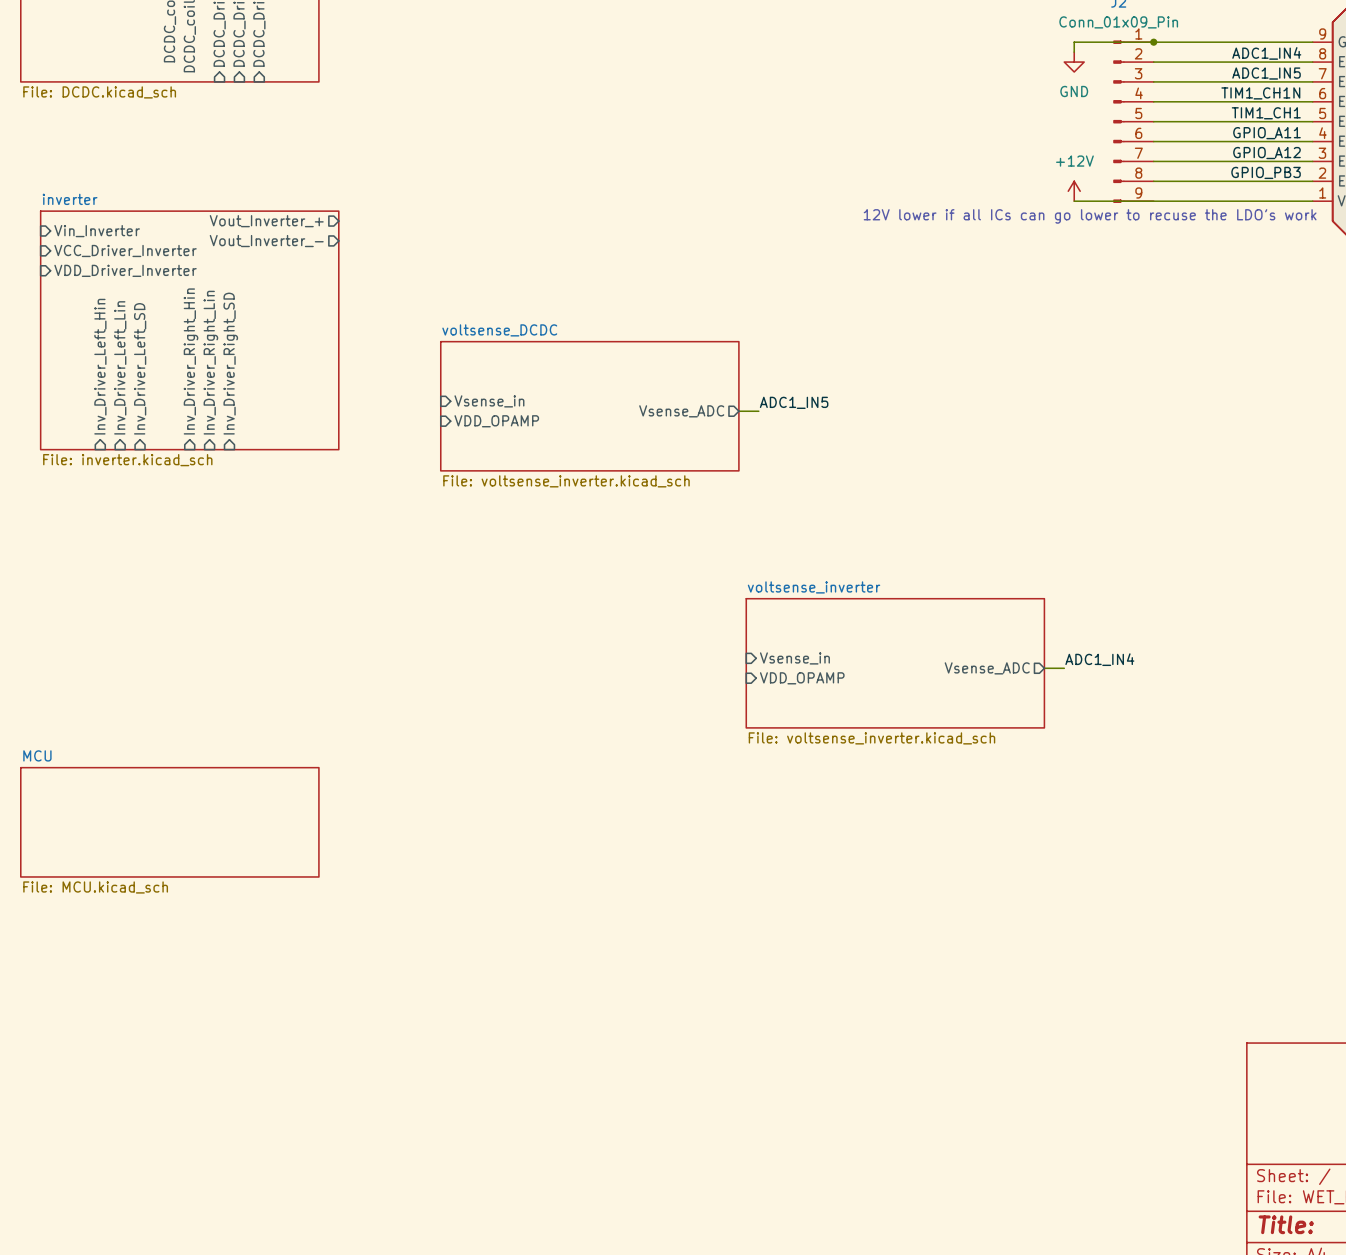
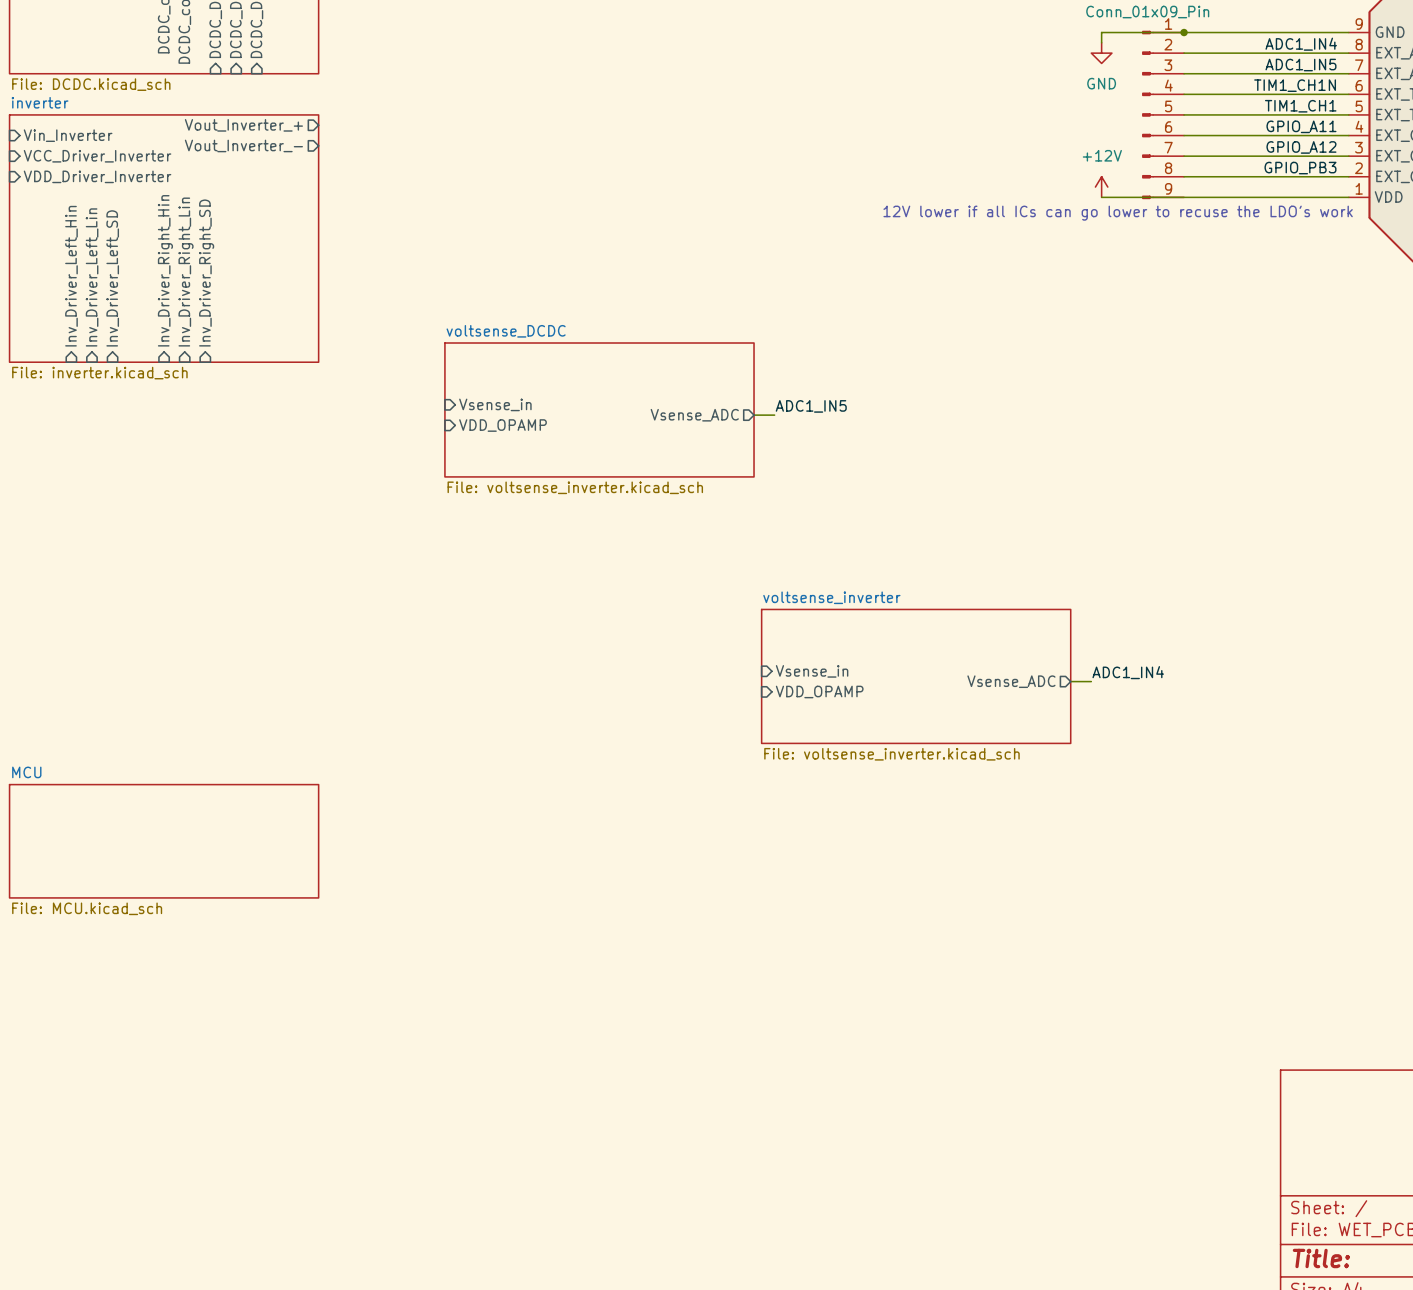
sheet pin position: Vout_Inverter_+ (266, 221) -> Vout_Inverter_+ (243, 125)
sheet pin position: Vin_Inverter (97, 231) -> Vin_Inverter (68, 135)
sheet pin position: Vout_Inverter_- (266, 241) -> Vout_Inverter_- (243, 145)
sheet pin position: VCC_Driver_Inverter (125, 250) -> VCC_Driver_Inverter (97, 156)
sheet pin position: VDD_Driver_Inverter (125, 270) -> VDD_Driver_Inverter (97, 176)
sheet inverter position: (189, 330) -> (164, 238)
sheet pin position: Inv_Driver_Right_Hin (191, 361) -> Inv_Driver_Right_Hin (165, 270)
sheet pin position: Inv_Driver_Right_Lin (210, 362) -> Inv_Driver_Right_Lin (186, 272)
sheet pin position: Inv_Driver_Right_SD (230, 363) -> Inv_Driver_Right_SD (206, 273)
sheet pin position: Inv_Driver_Left_Hin (100, 366) -> Inv_Driver_Left_Hin (71, 276)
sheet pin position: Inv_Driver_Left_Lin (120, 367) -> Inv_Driver_Left_Lin (92, 277)
sheet pin position: Inv_Driver_Left_SD (140, 368) -> Inv_Driver_Left_SD (112, 278)

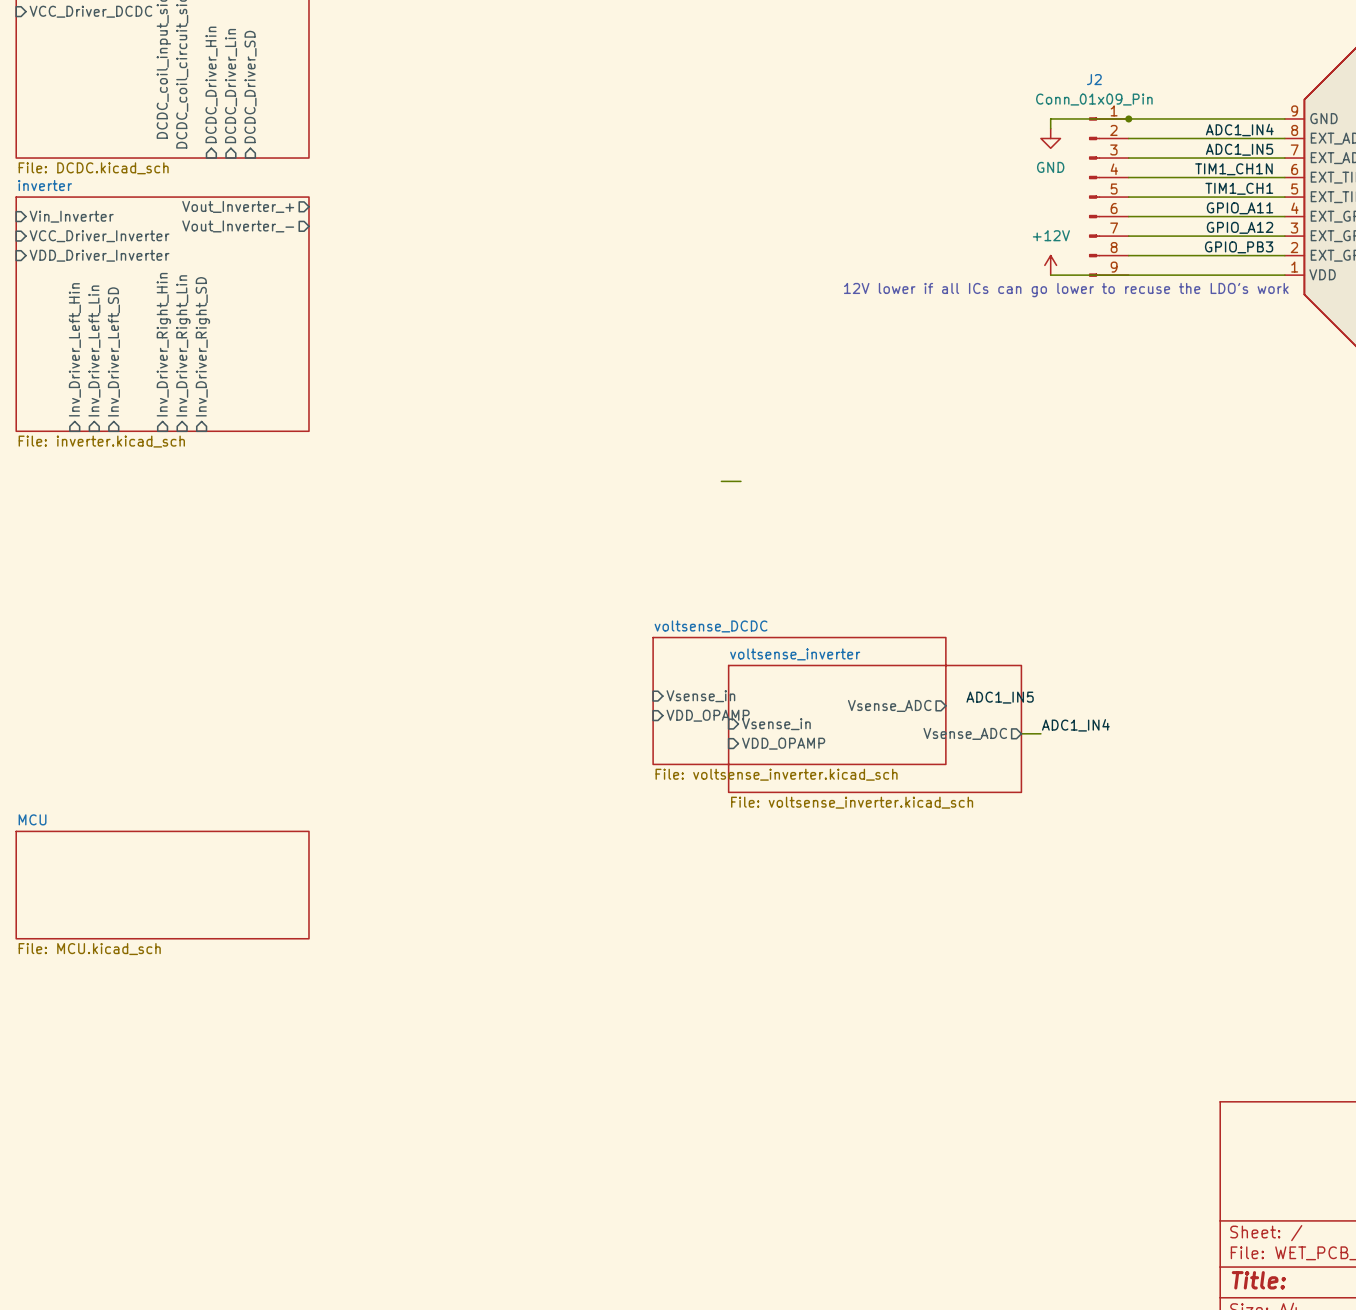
sheet pin: Vsense_in (495, 404) -> none
label: ADC1_IN5 (811, 406) -> none
sheet voltsense_DCDC: File: voltsense_inverter.kicad_sch (599, 409) -> none
sheet pin: Vsense_ADC (694, 415) -> none
sheet pin: VDD_OPAMP (502, 425) -> none
sheet pin: none -> Vsense_in (700, 696)
label: none -> ADC1_IN5 (1000, 697)
sheet voltsense_DCDC: none -> File: voltsense_inverter.kicad_sch (799, 700)
sheet pin: none -> Vsense_ADC (889, 705)
sheet pin: none -> VDD_OPAMP (708, 715)

